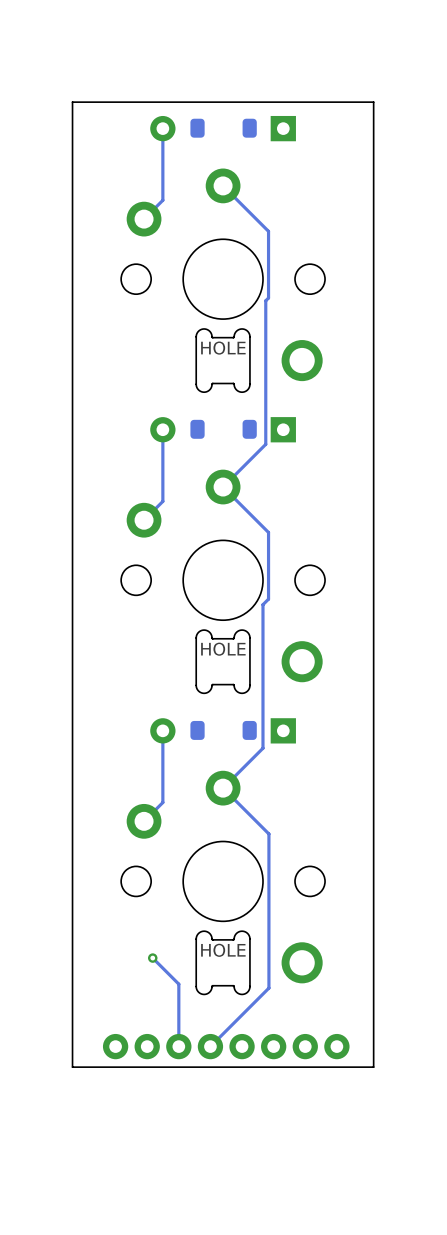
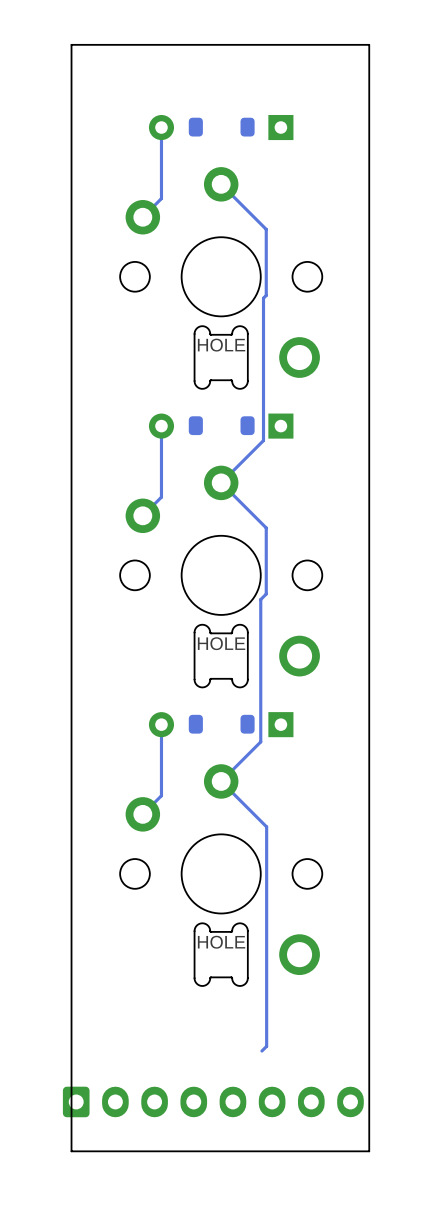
board edge: (373, 102) (72, 102) (72, 1067) (373, 1067) (373, 102) -> (369, 44) (369, 1151) (71, 1151) (71, 44) (369, 44)
track: (152, 958) (178, 984) (178, 1046) -> none
via: (152, 958) -> none
track: (268, 988) (210, 1046) -> (266, 979) (266, 1046) (261, 1051)
part: (226, 1046) -> none
part: none -> (213, 1101)

